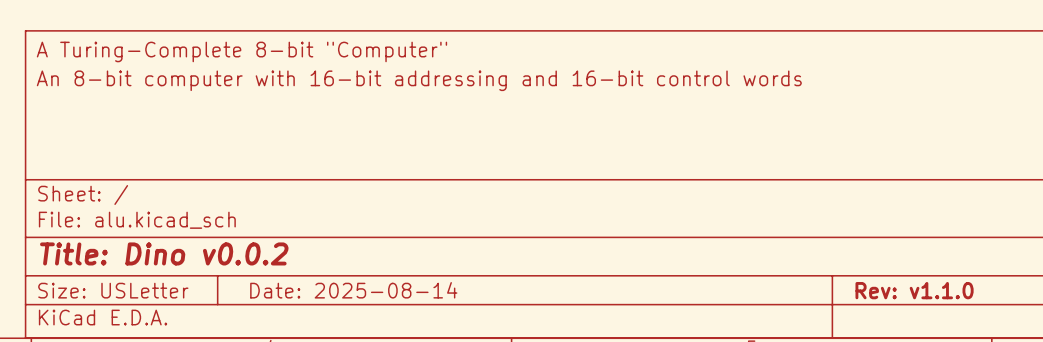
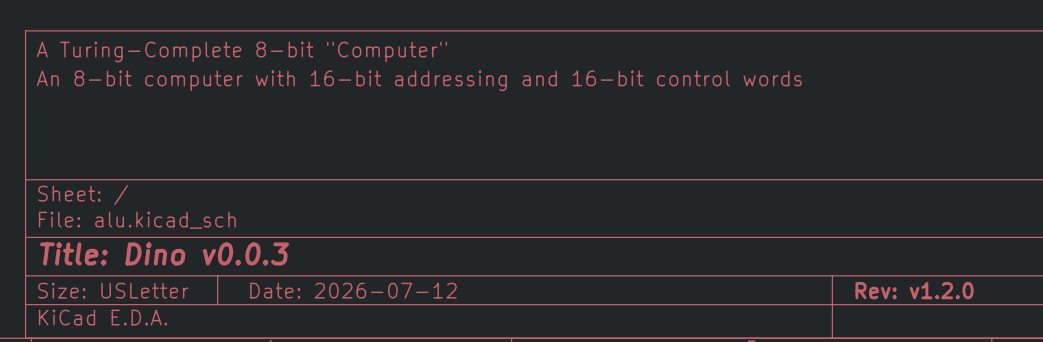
title block: Title: Dino v0.0.2 (164, 253) -> Title: Dino v0.0.3 (164, 253)
title block: Date: 2025-08-14 (353, 290) -> Date: 2026-07-12 (353, 290)
title block: Rev: v1.1.0 (914, 290) -> Rev: v1.2.0 (914, 290)

